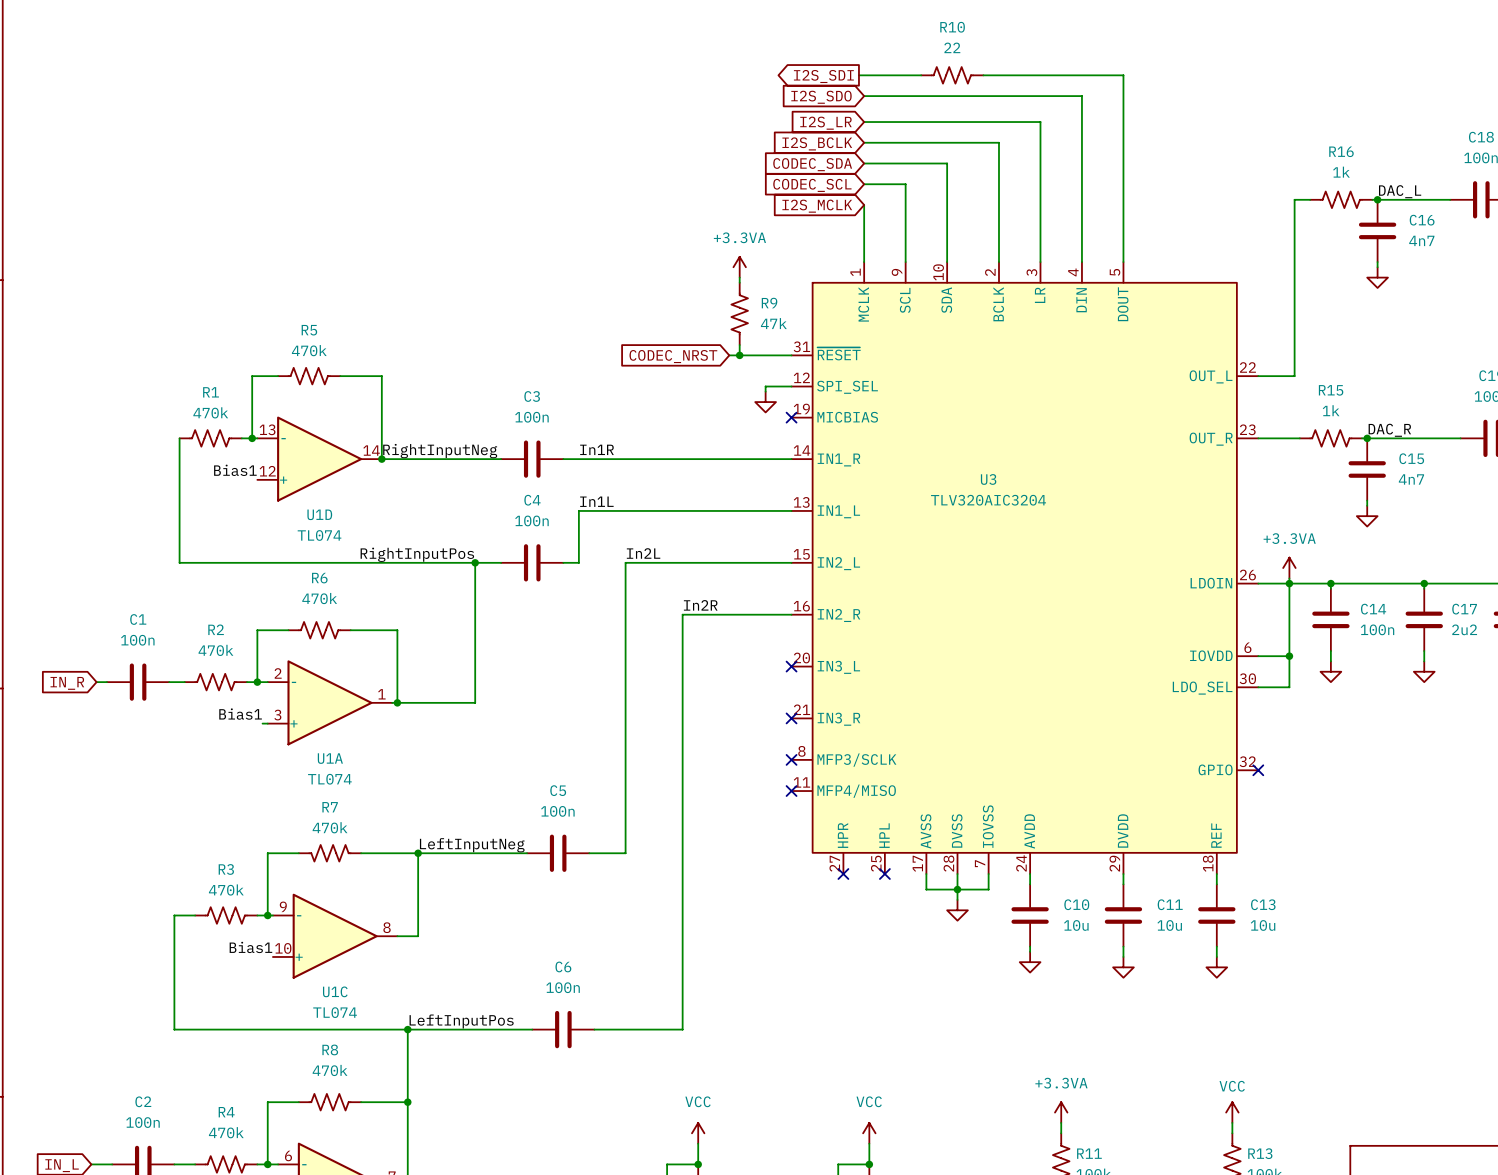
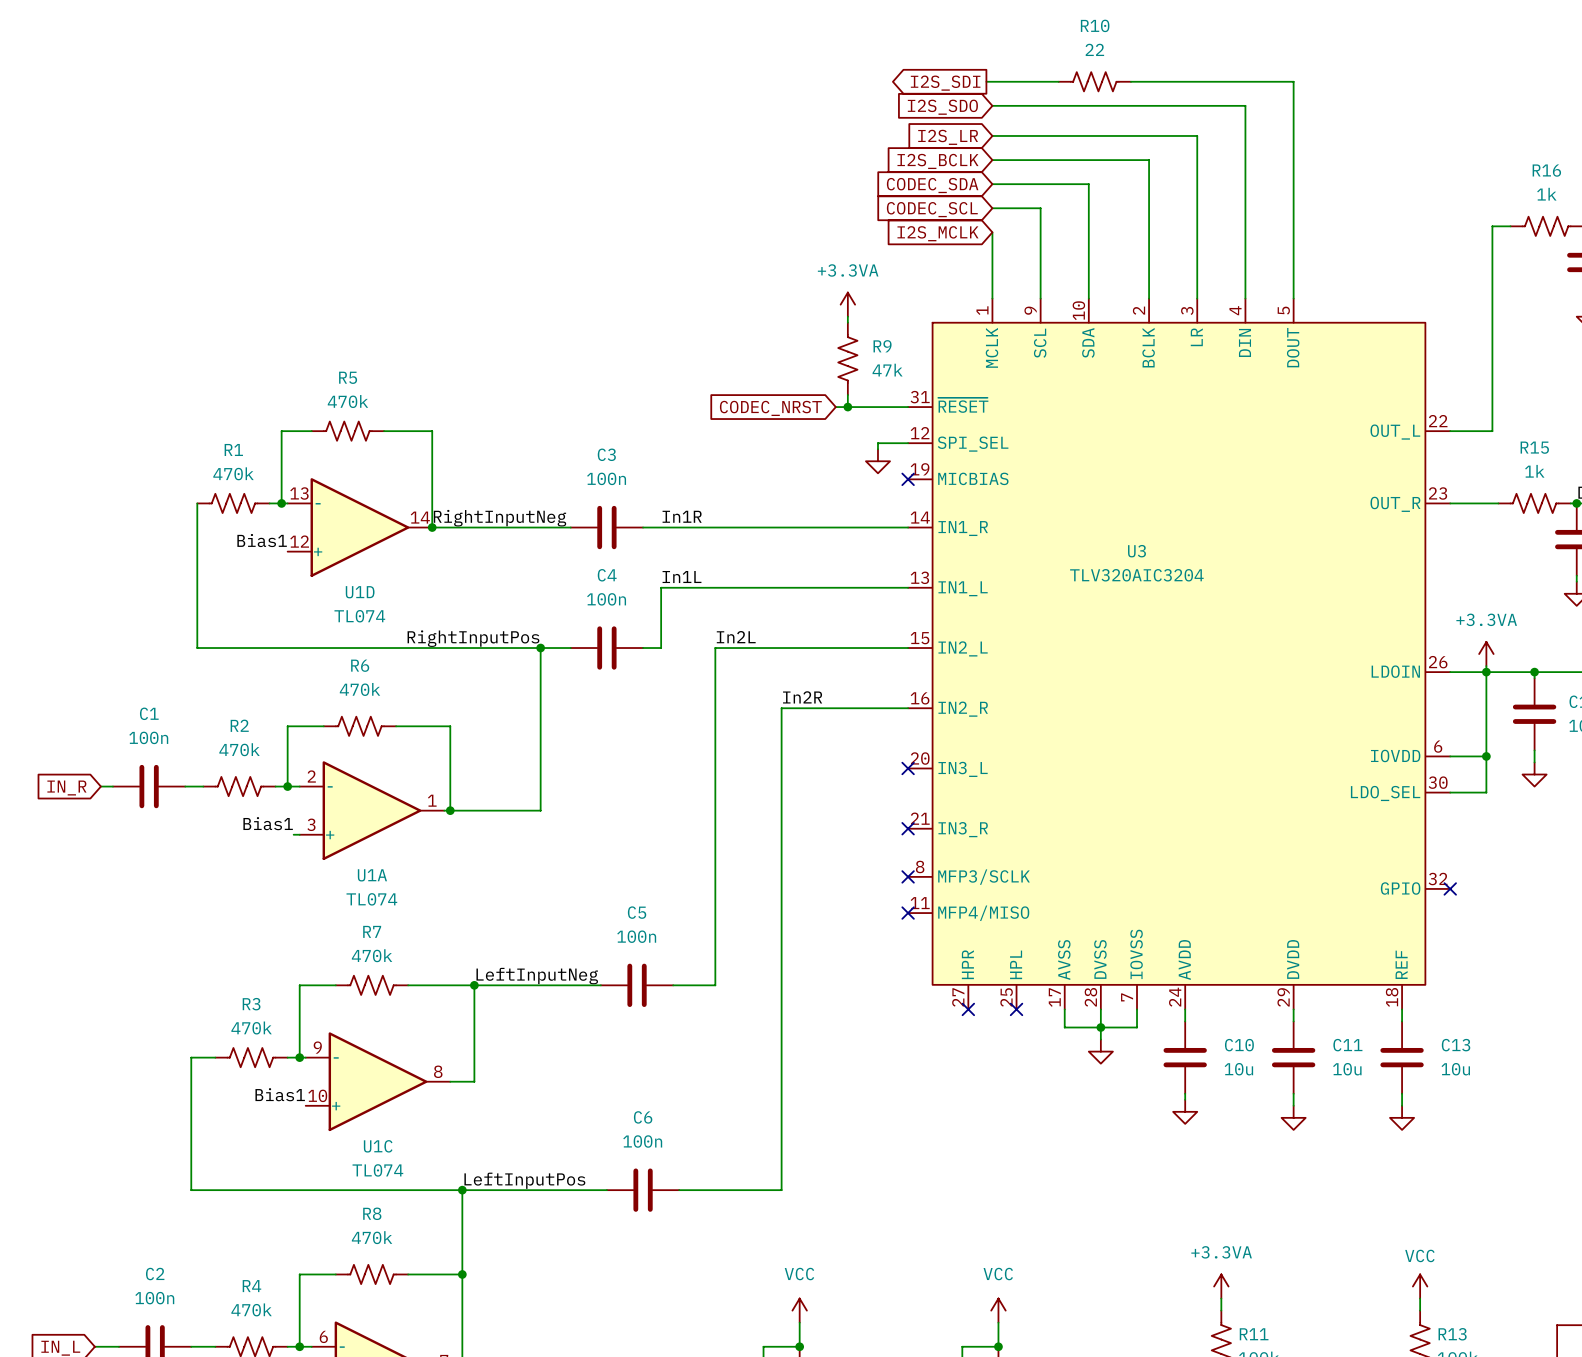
R7 flip: as is (329, 853) -> left-right (371, 985)

